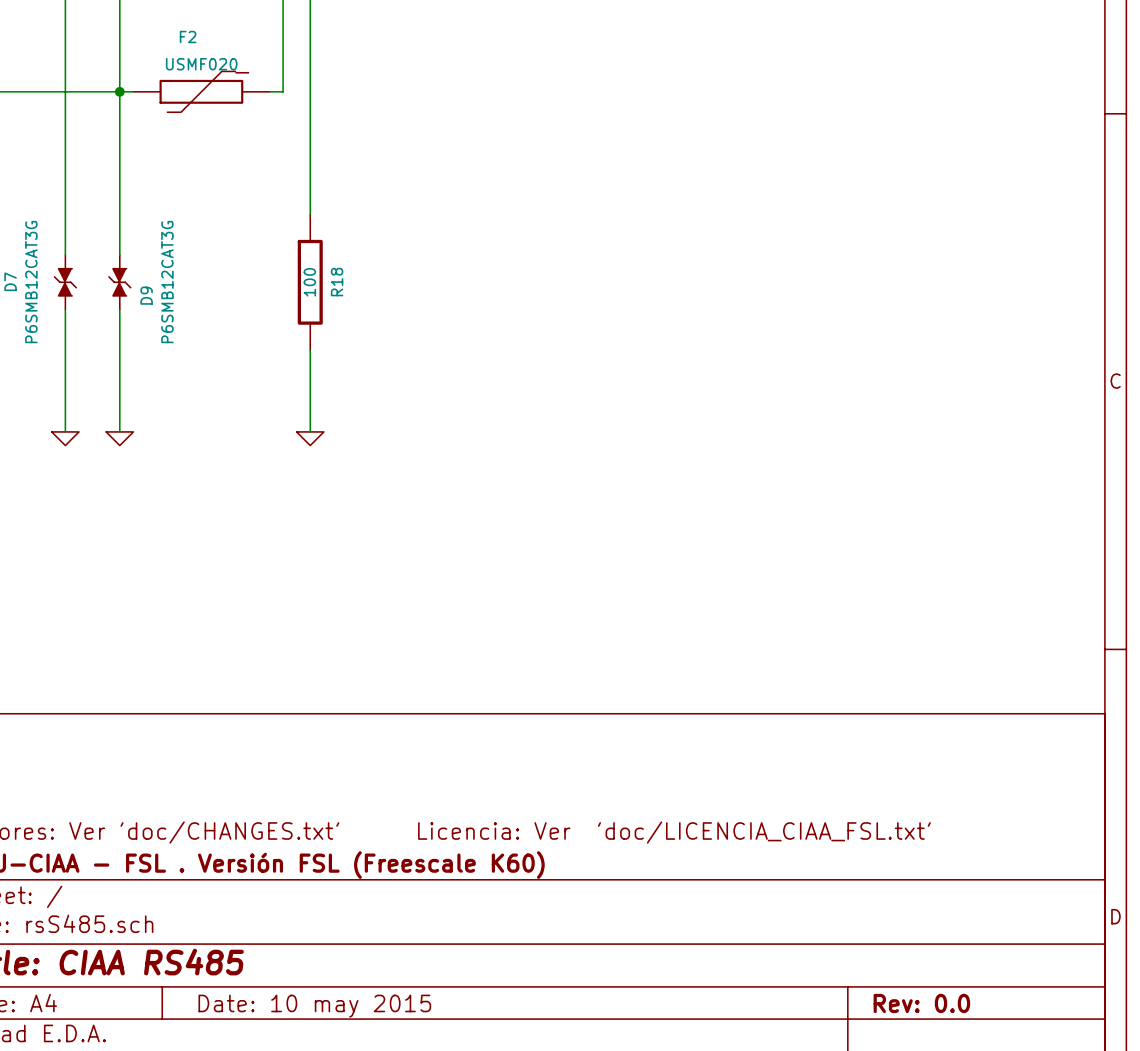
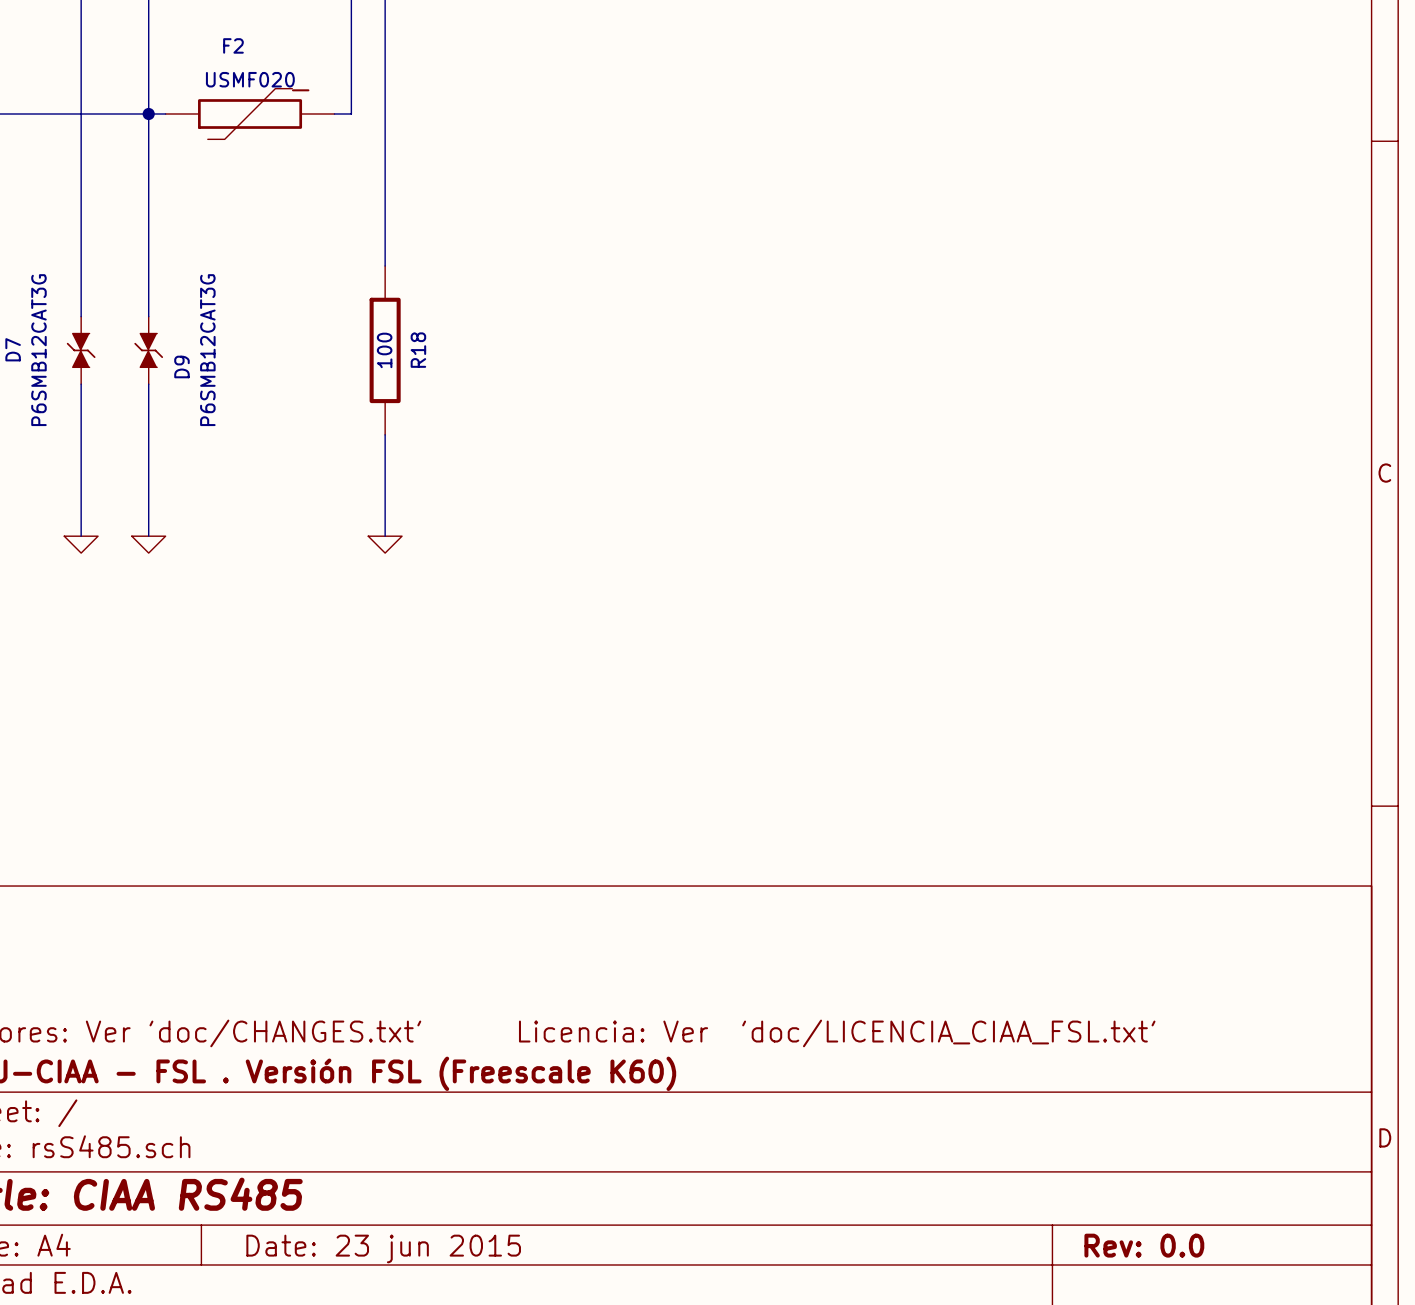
title block: Date: 10 may 2015 (314, 1006) -> Date: 23 jun 2015 (383, 1248)

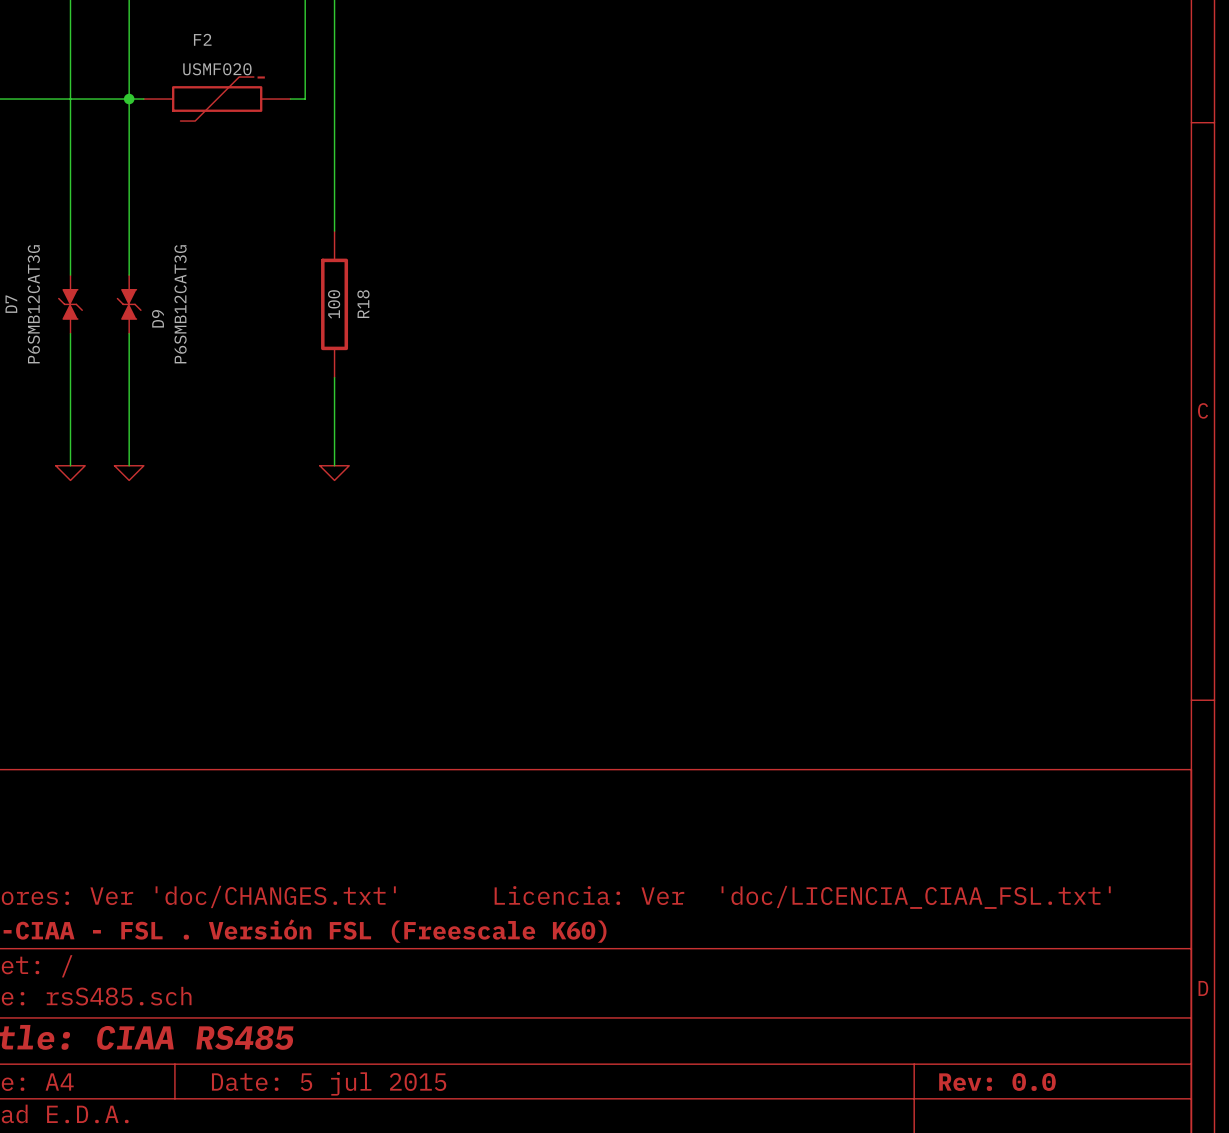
title block: Date: 23 jun 2015 (383, 1248) -> Date: 5 jul 2015 (329, 1083)

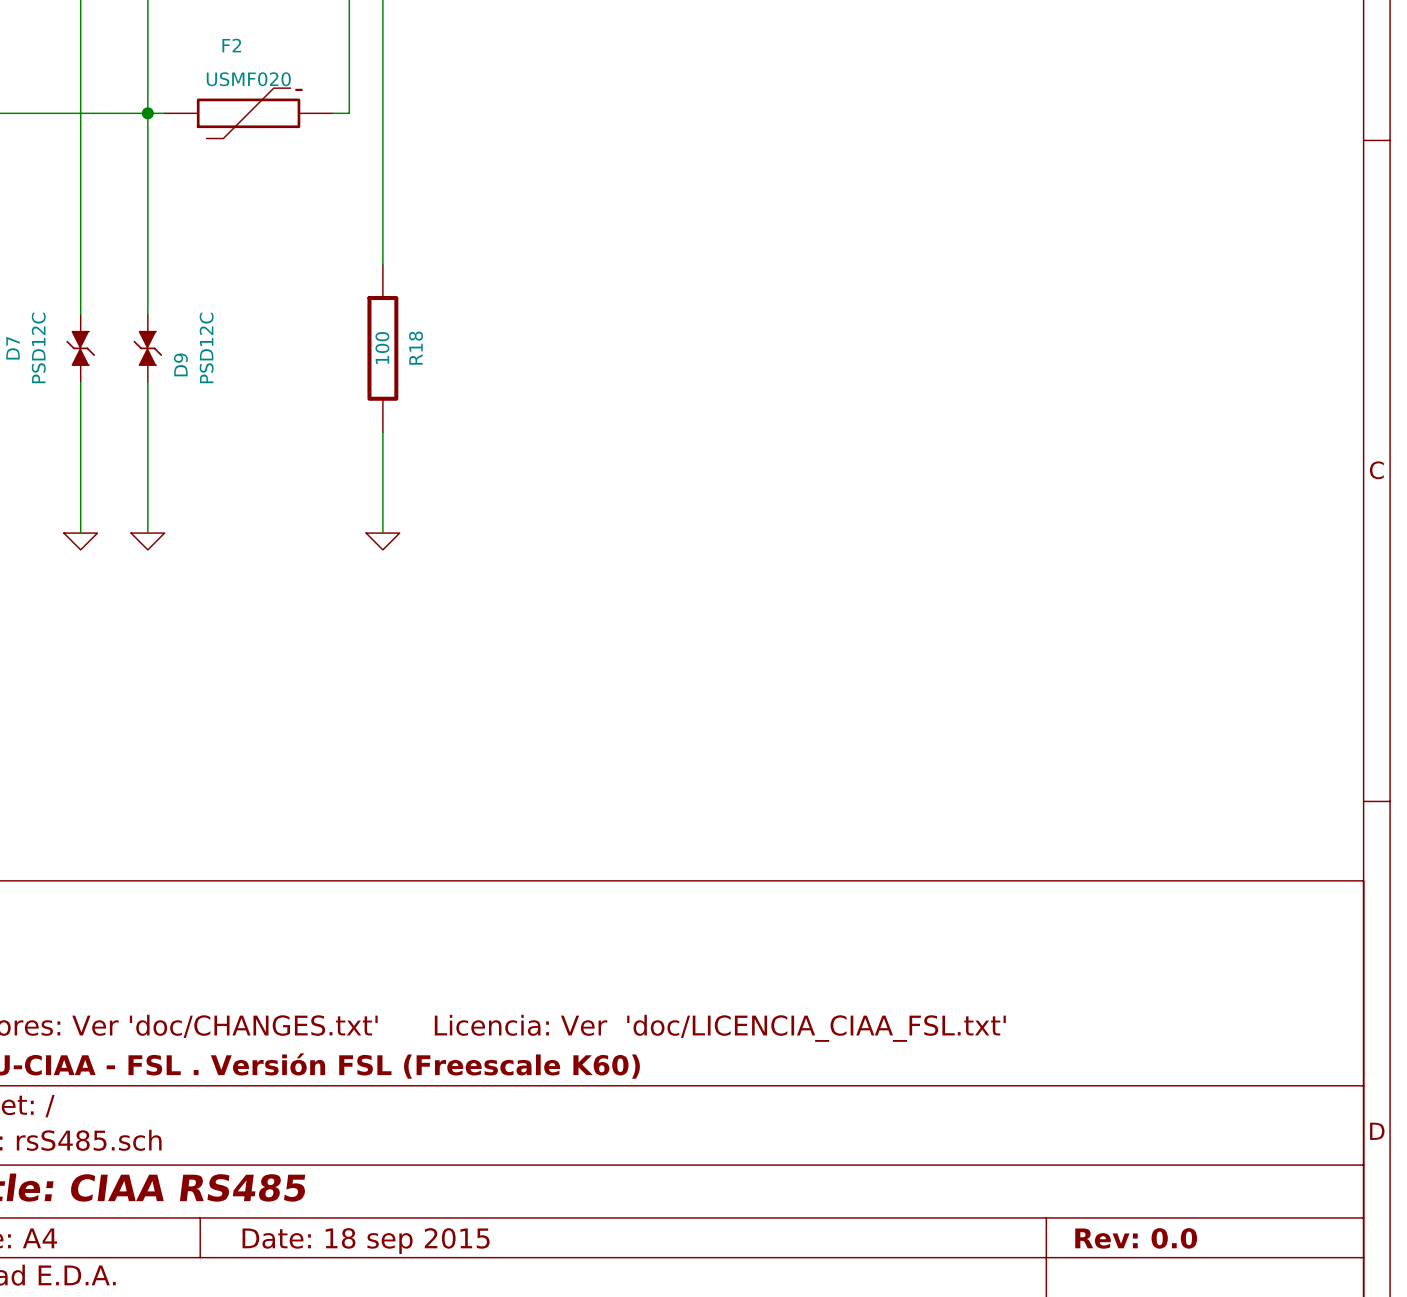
D7 value: P6SMB12CAT3G (33, 304) -> PSD12C (38, 347)
D9 value: P6SMB12CAT3G (180, 304) -> PSD12C (206, 347)
title block: Date: 5 jul 2015 (329, 1083) -> Date: 18 sep 2015 (366, 1241)

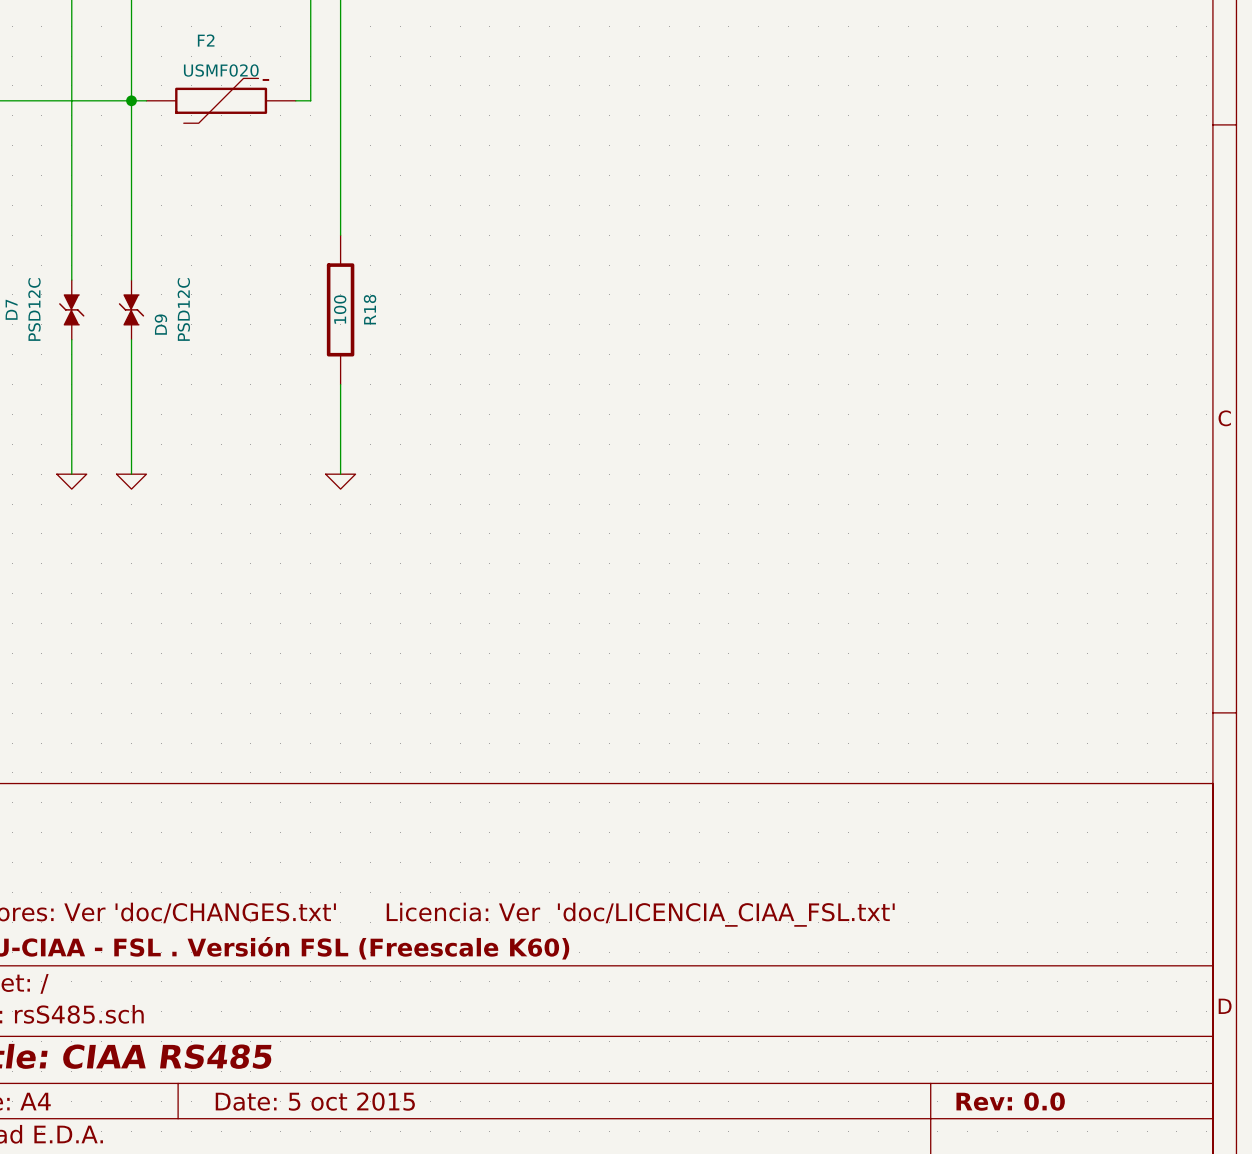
title block: Date: 18 sep 2015 (366, 1241) -> Date: 5 oct 2015 (315, 1101)

